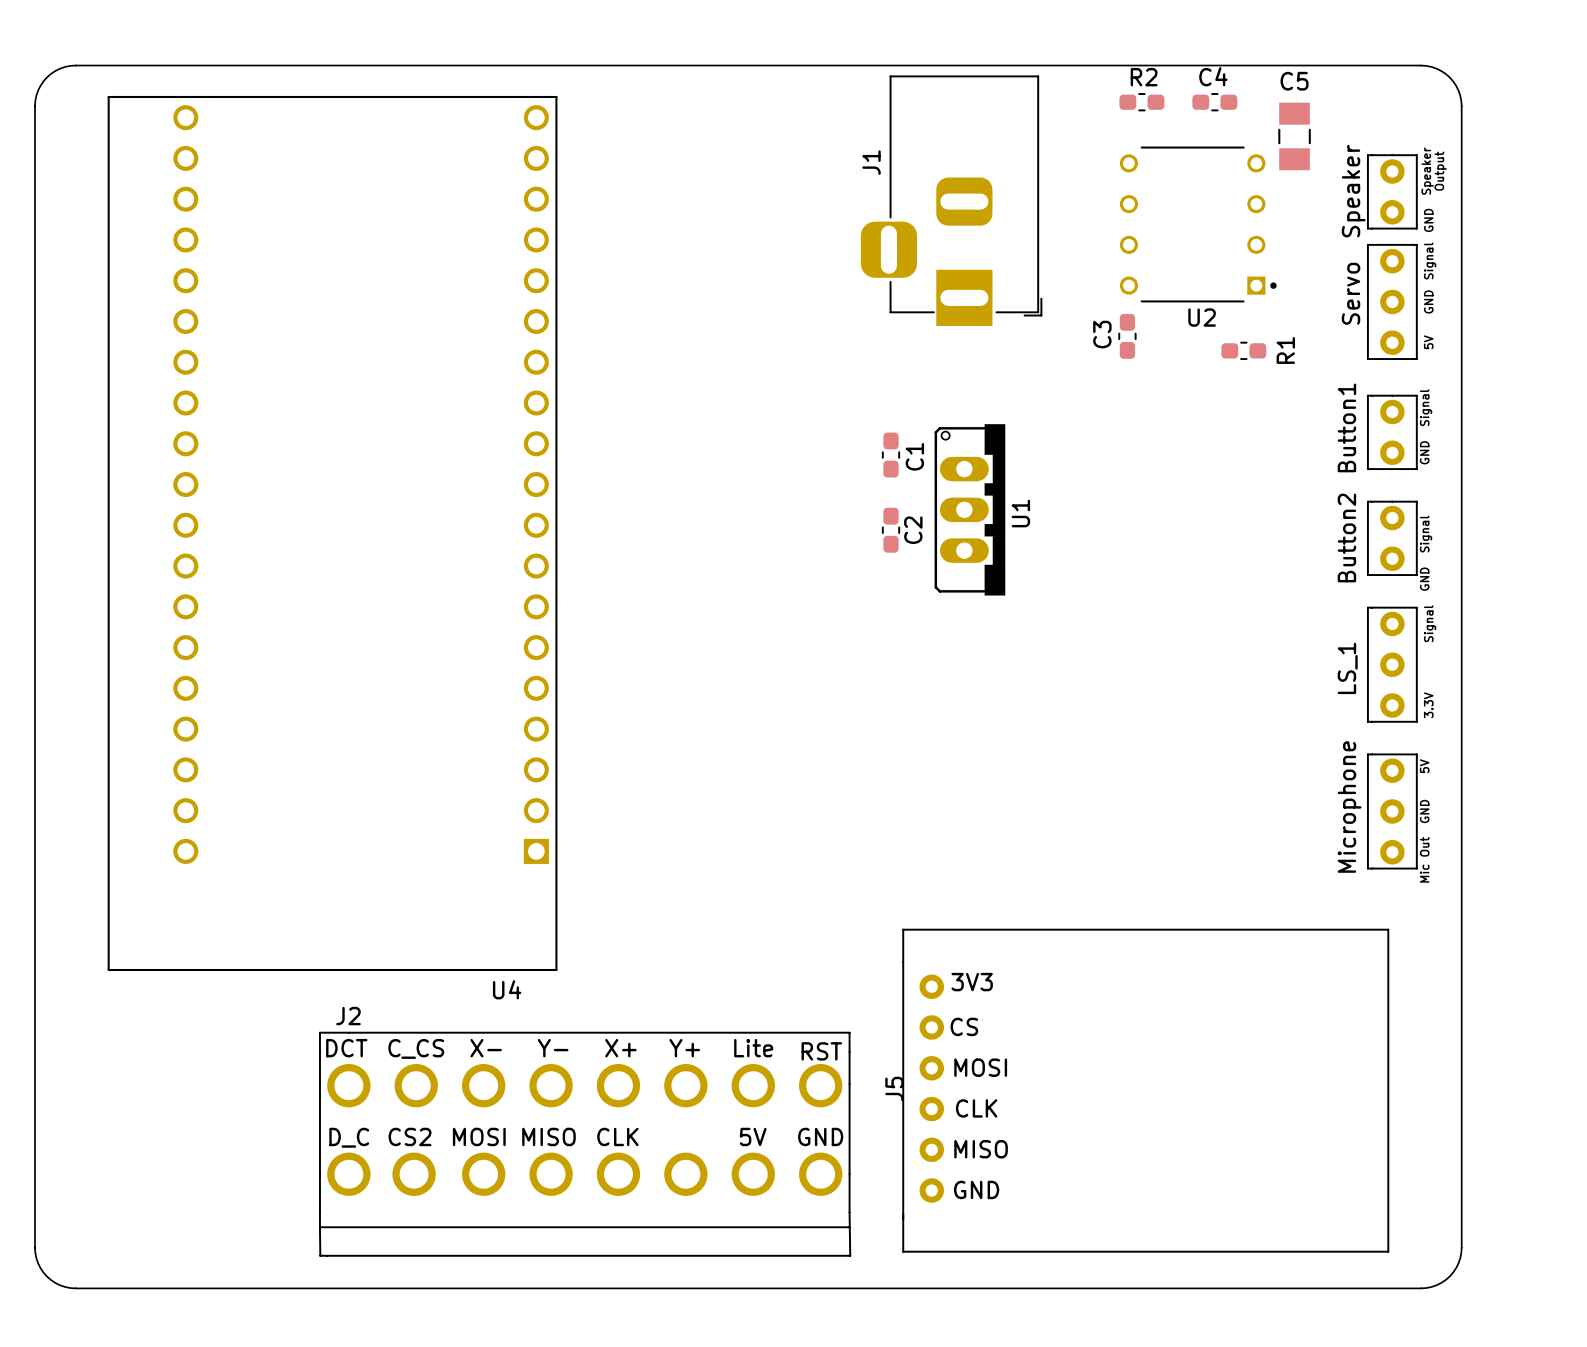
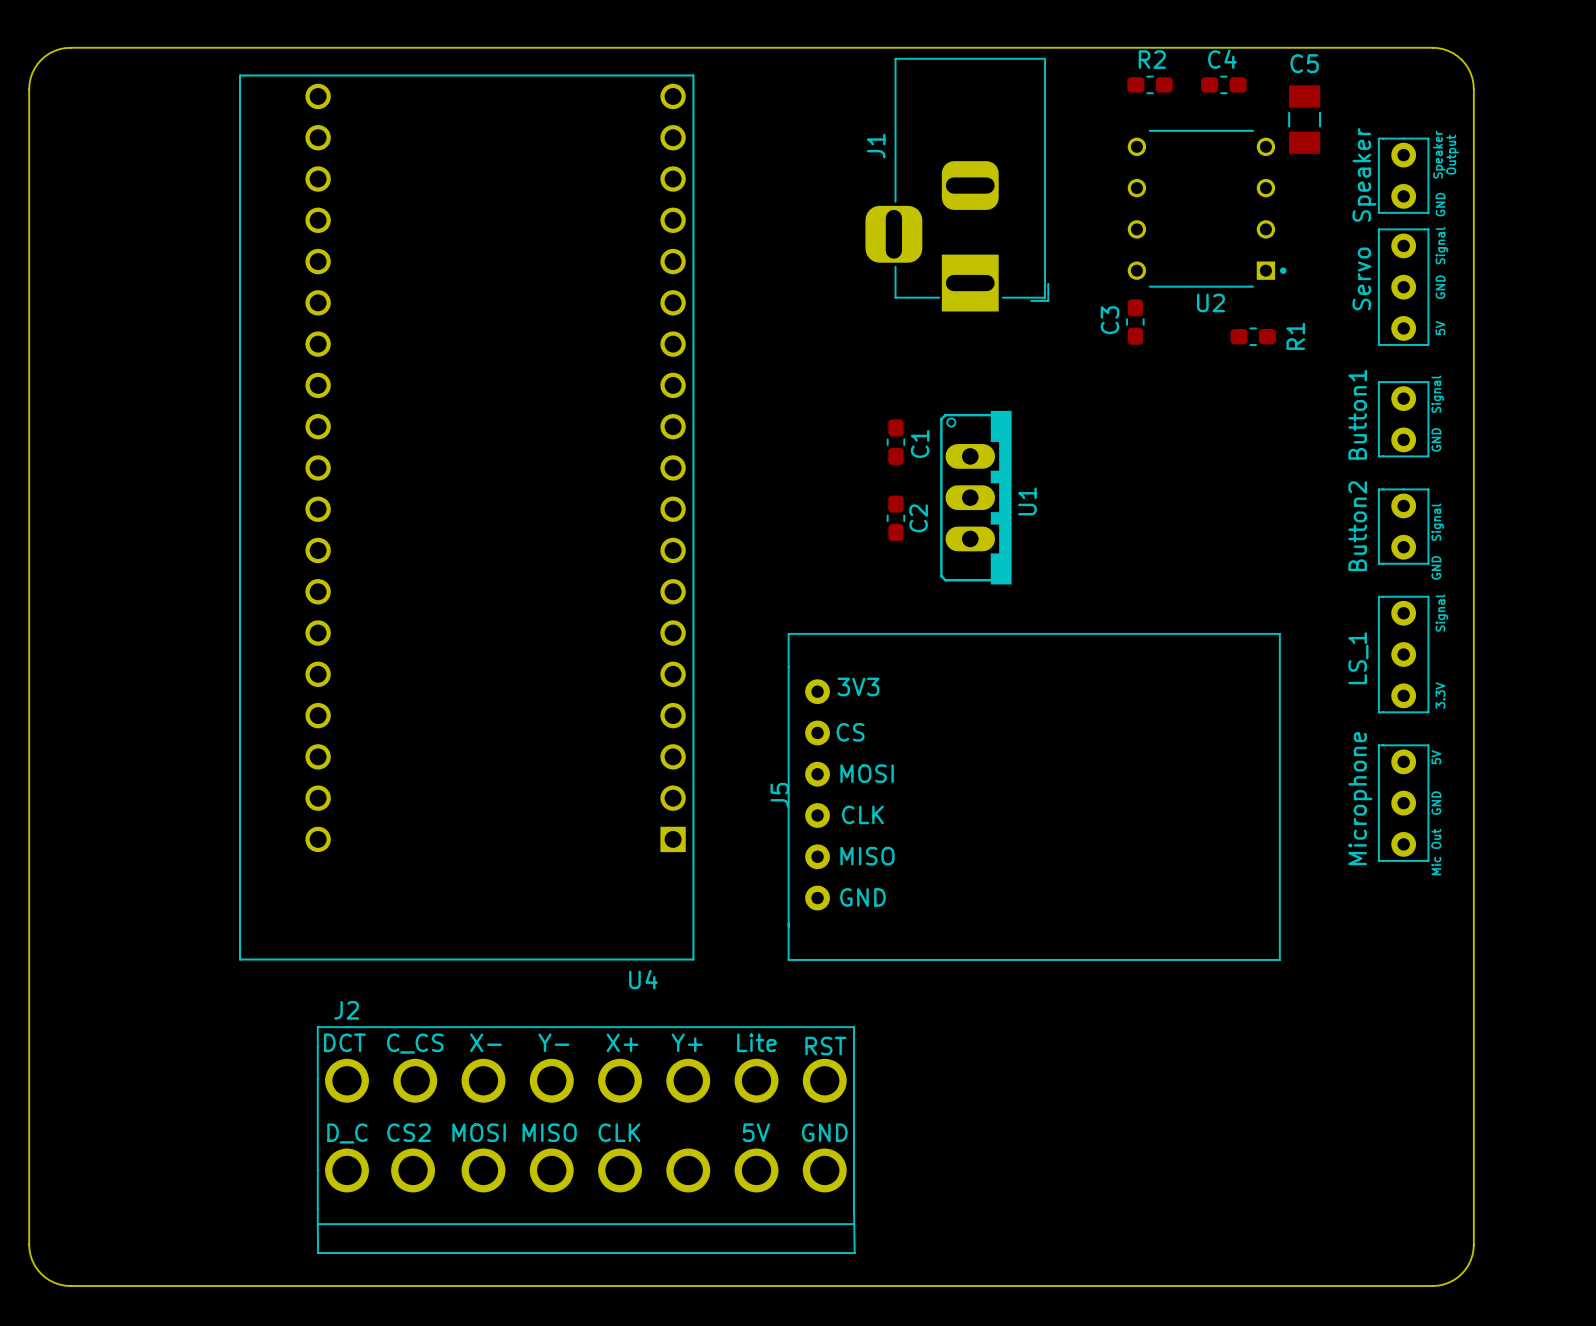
U4 position: (332, 533) -> (466, 517)
J5 position: (1145, 1090) -> (1034, 796)

